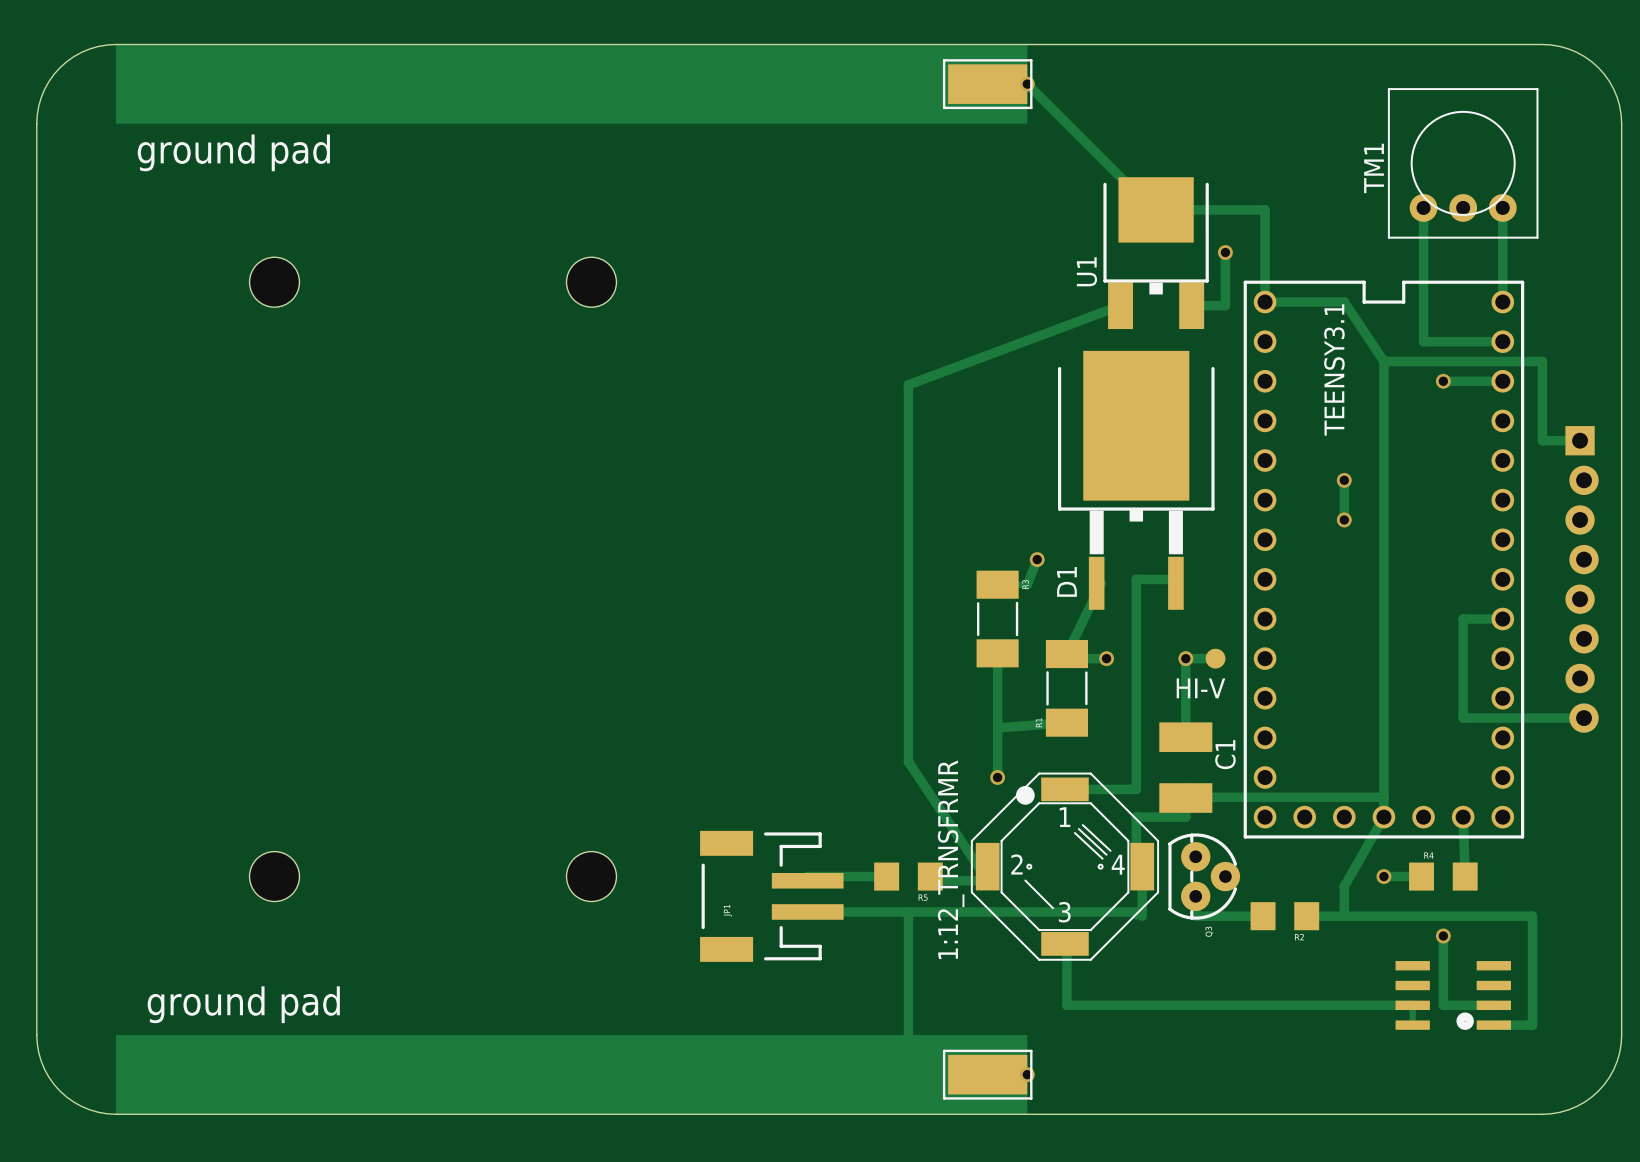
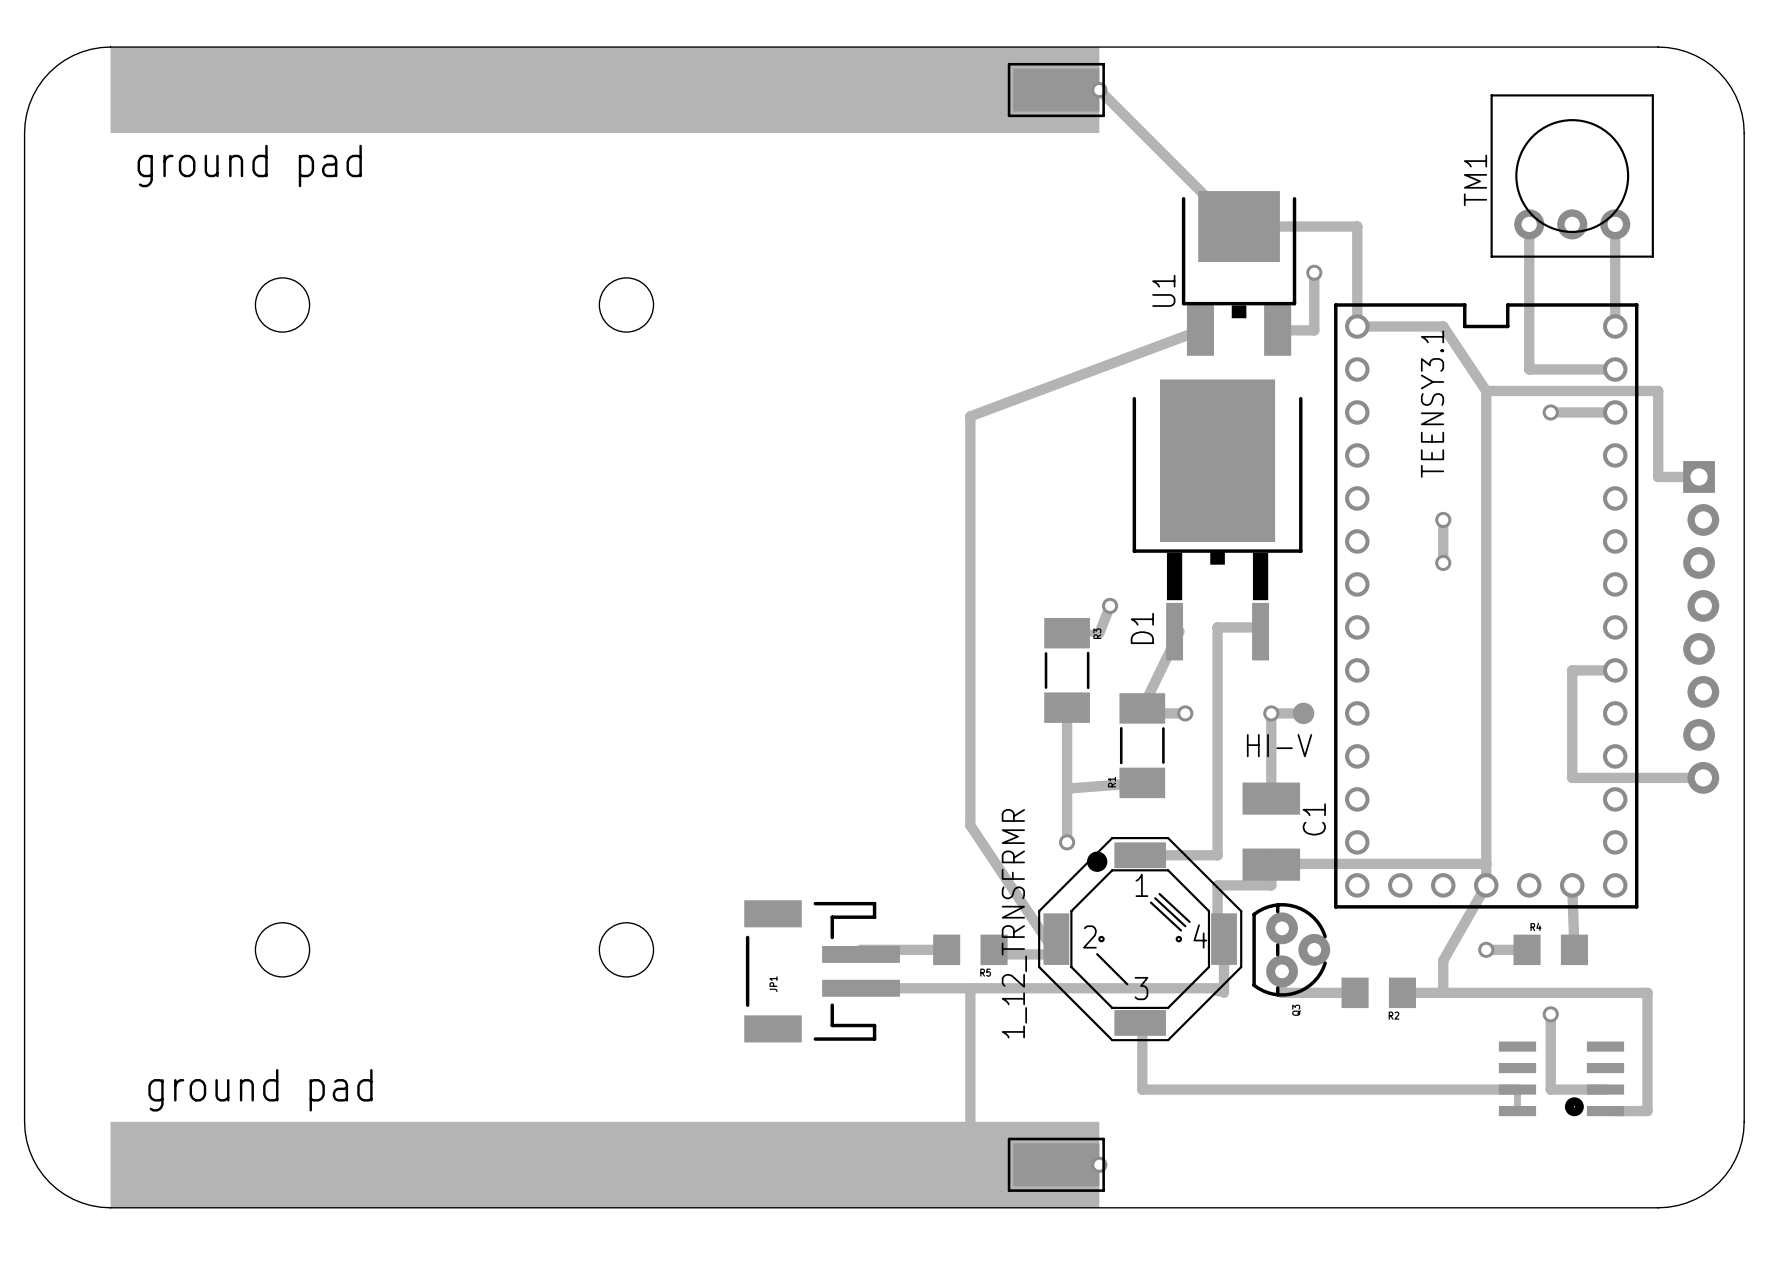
1_12_TRNSFRMR name: 1:12_TRNSFRMR (951, 859) -> 1_12_TRNSFRMR (1014, 923)

